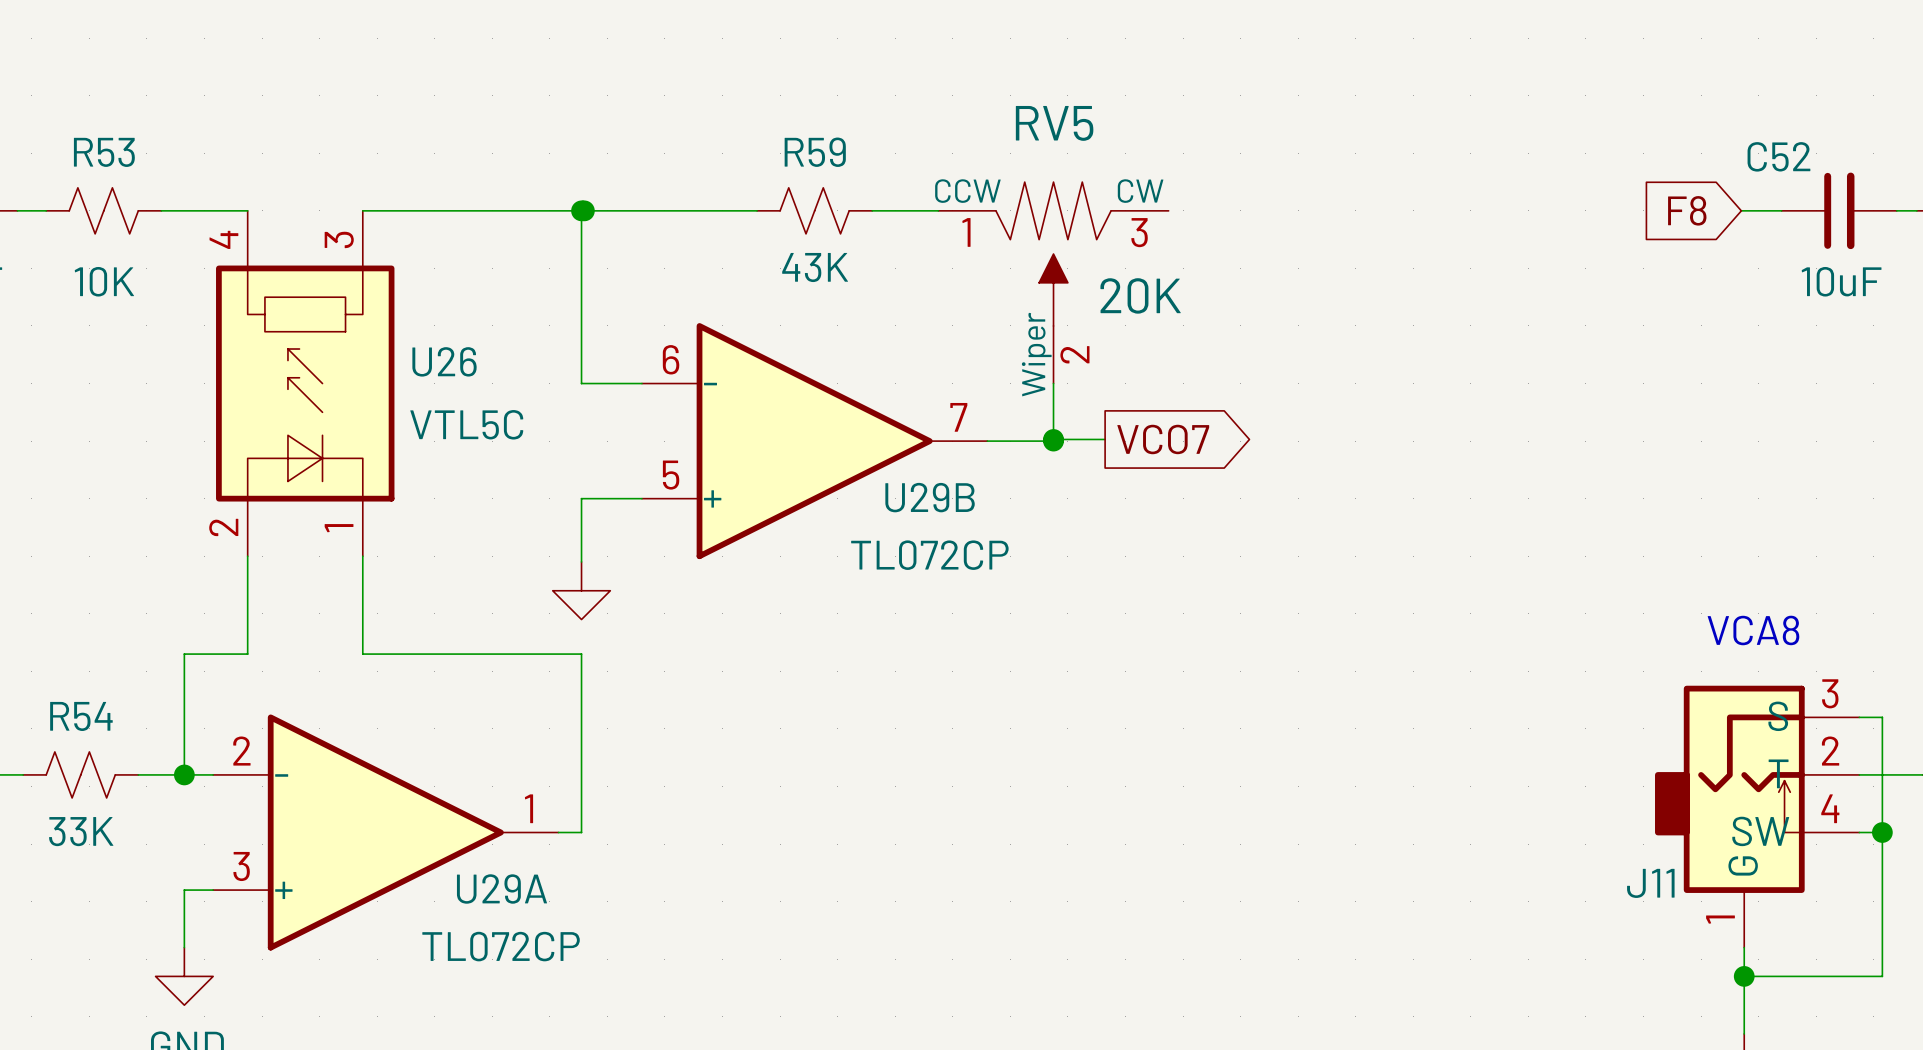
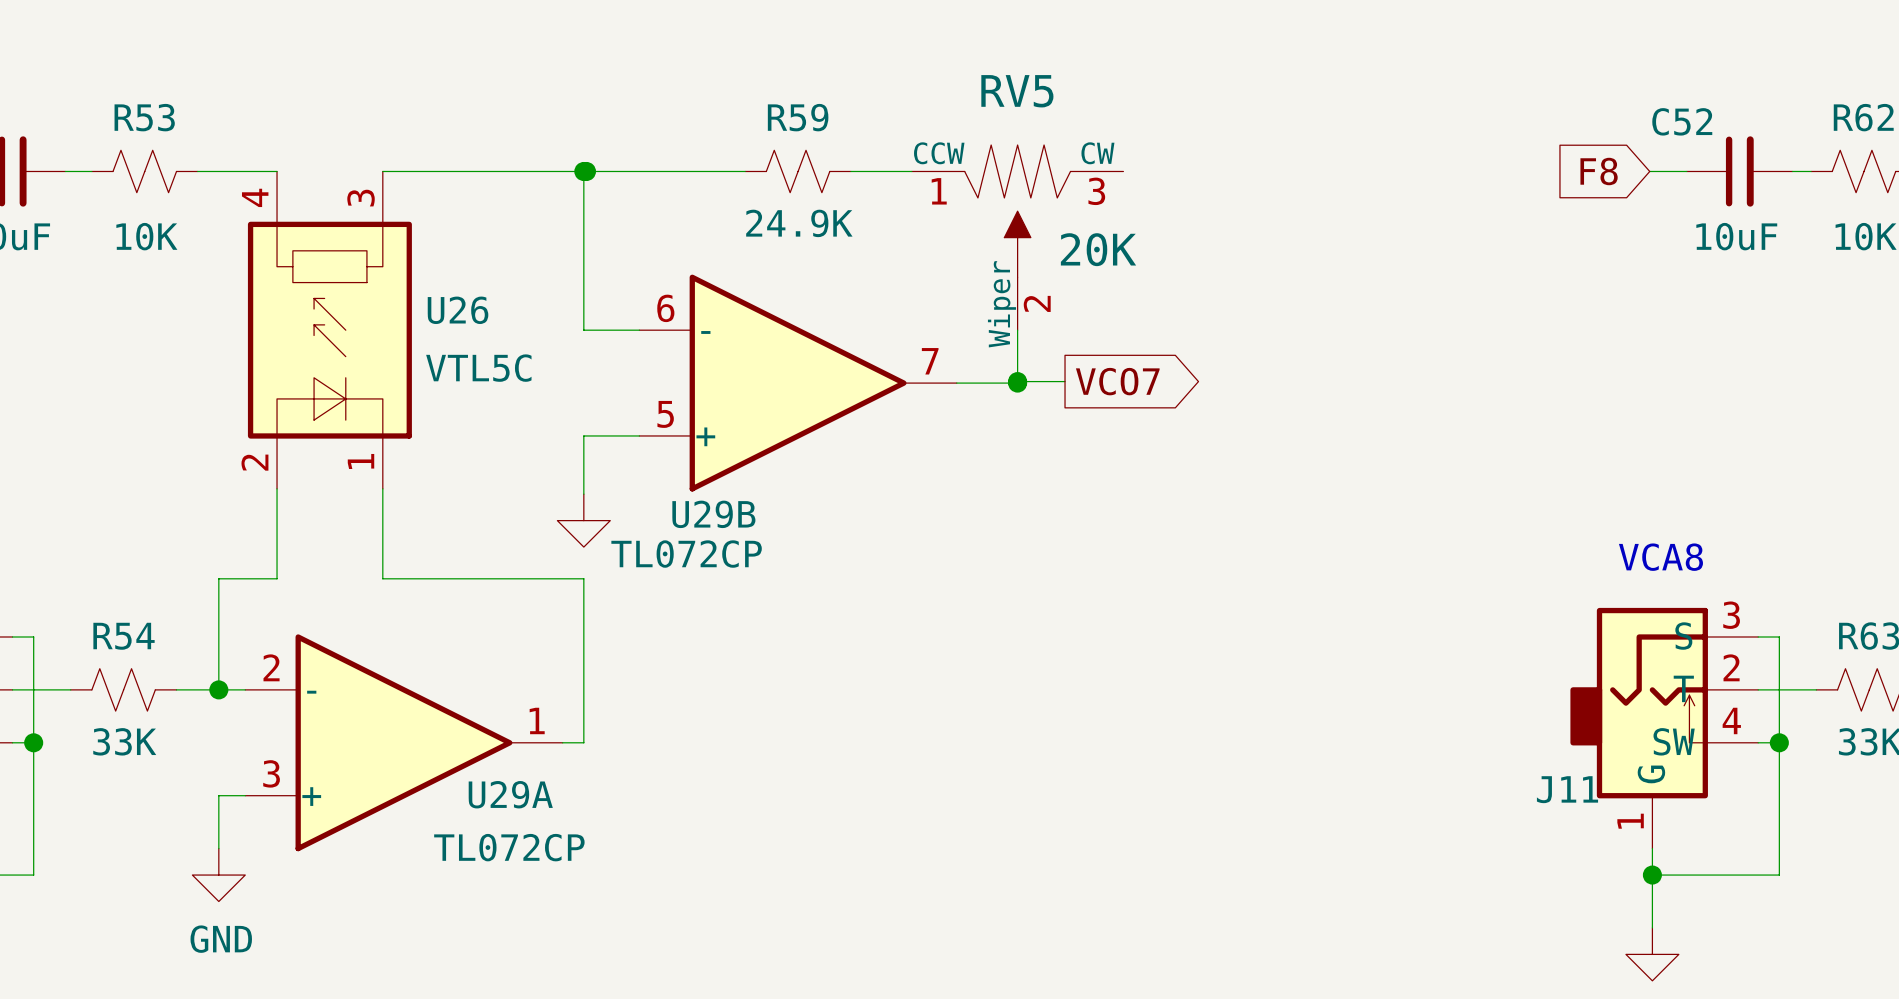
R59 value: 43K (815, 267) -> 24.9K (799, 223)
U29B name position: U29B (930, 497) -> U29B (713, 514)
U29B value position: TL072CP (929, 555) -> TL072CP (686, 554)

